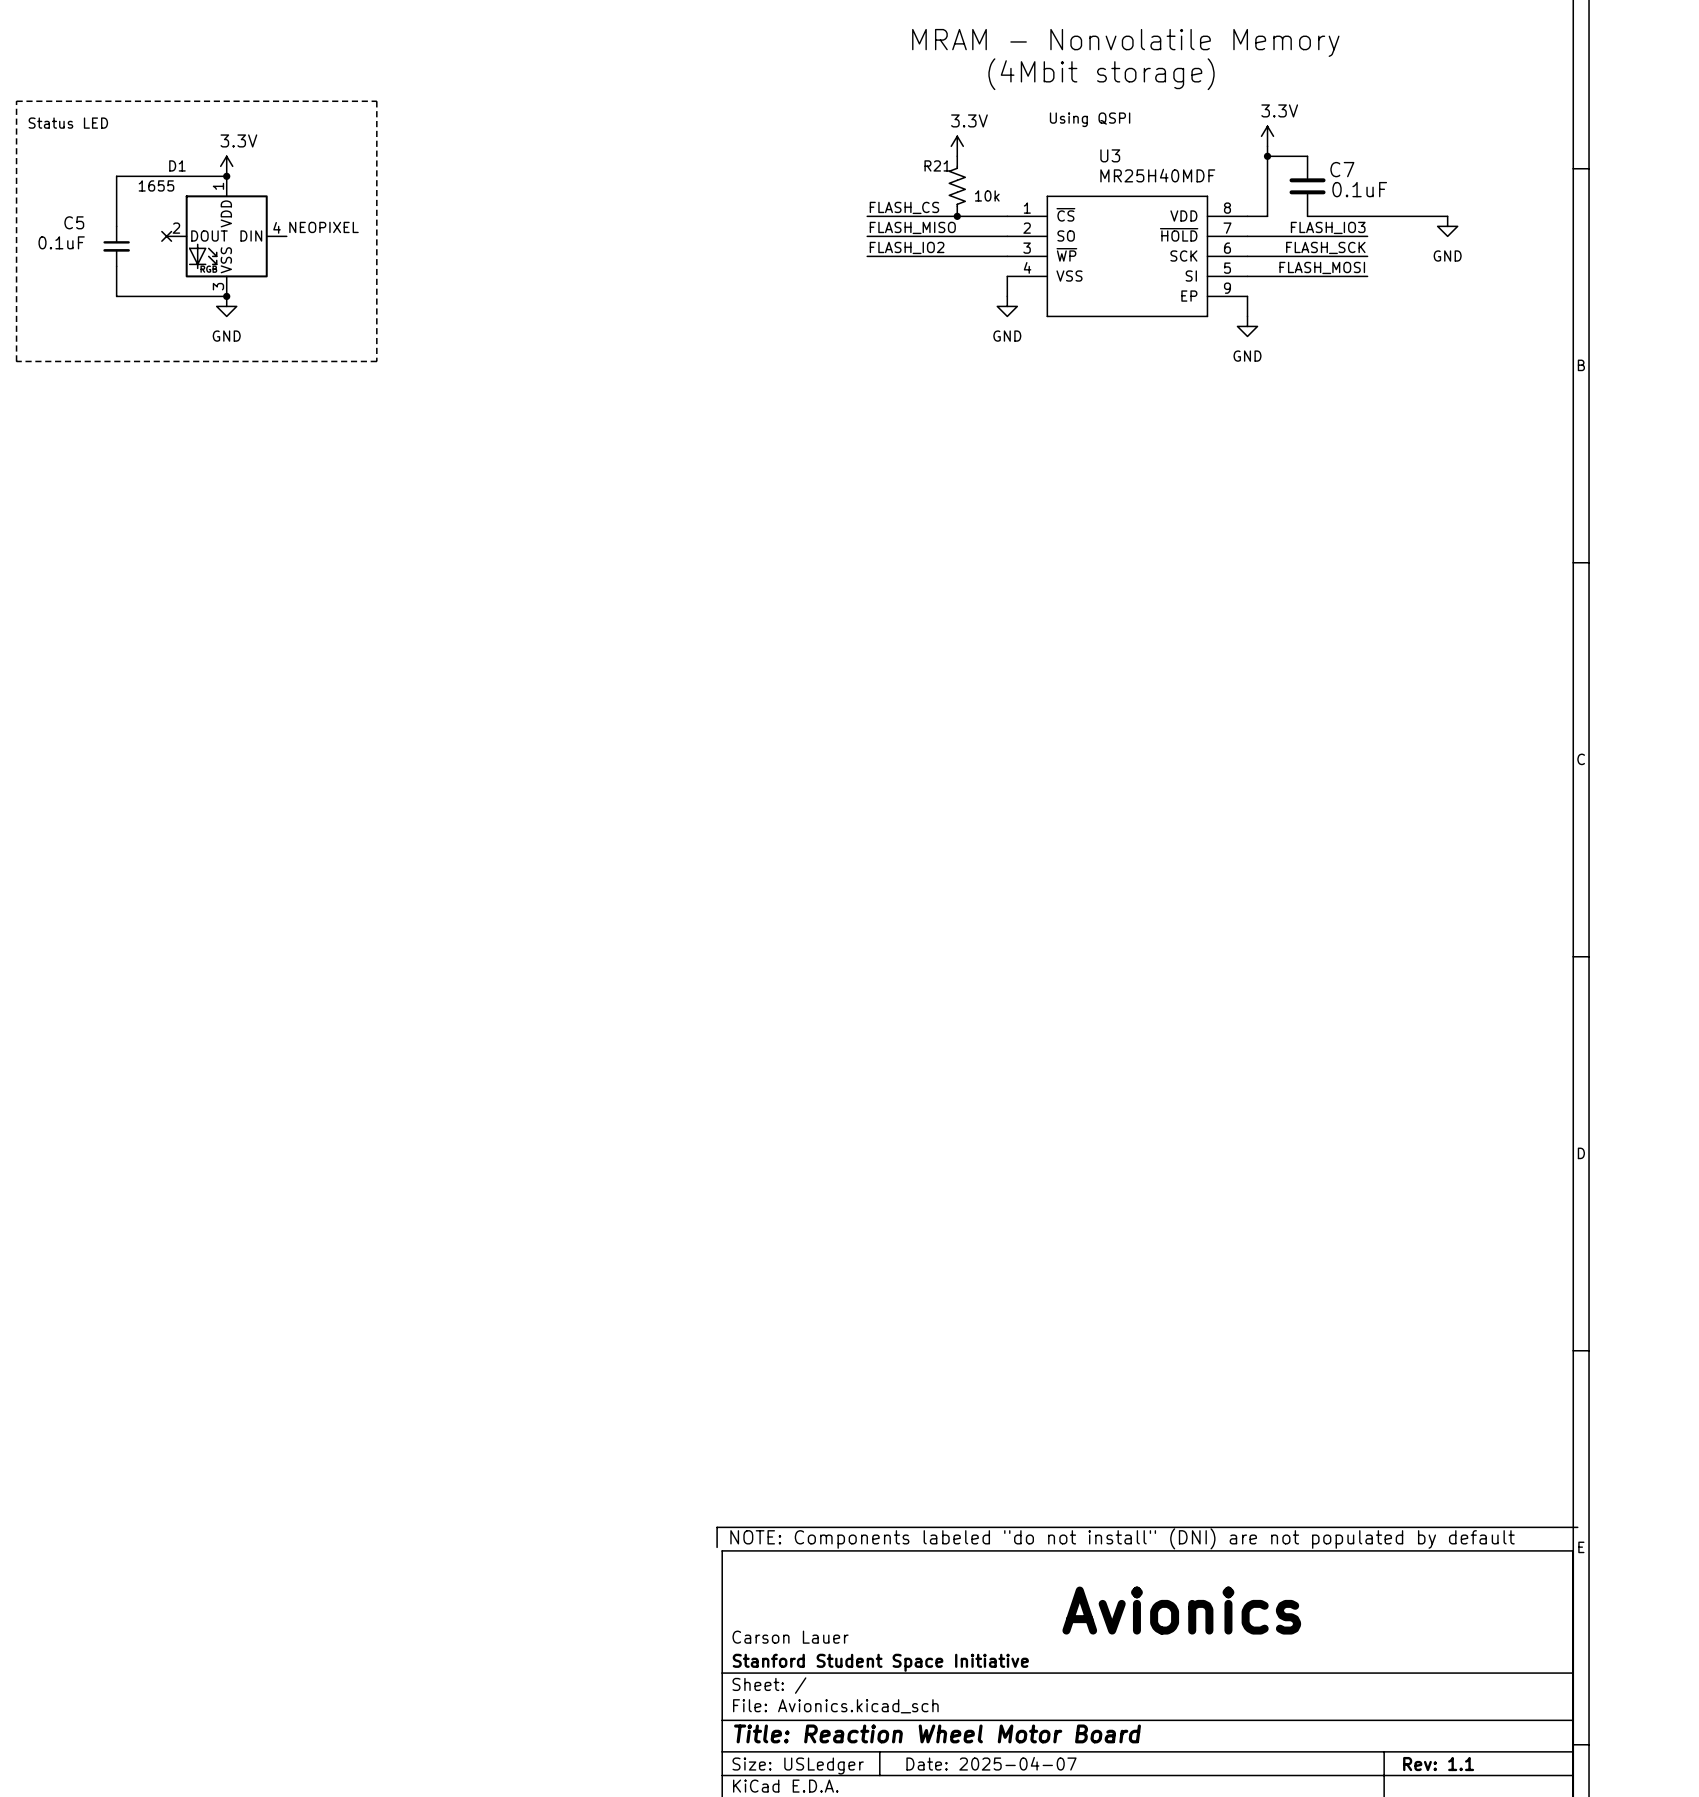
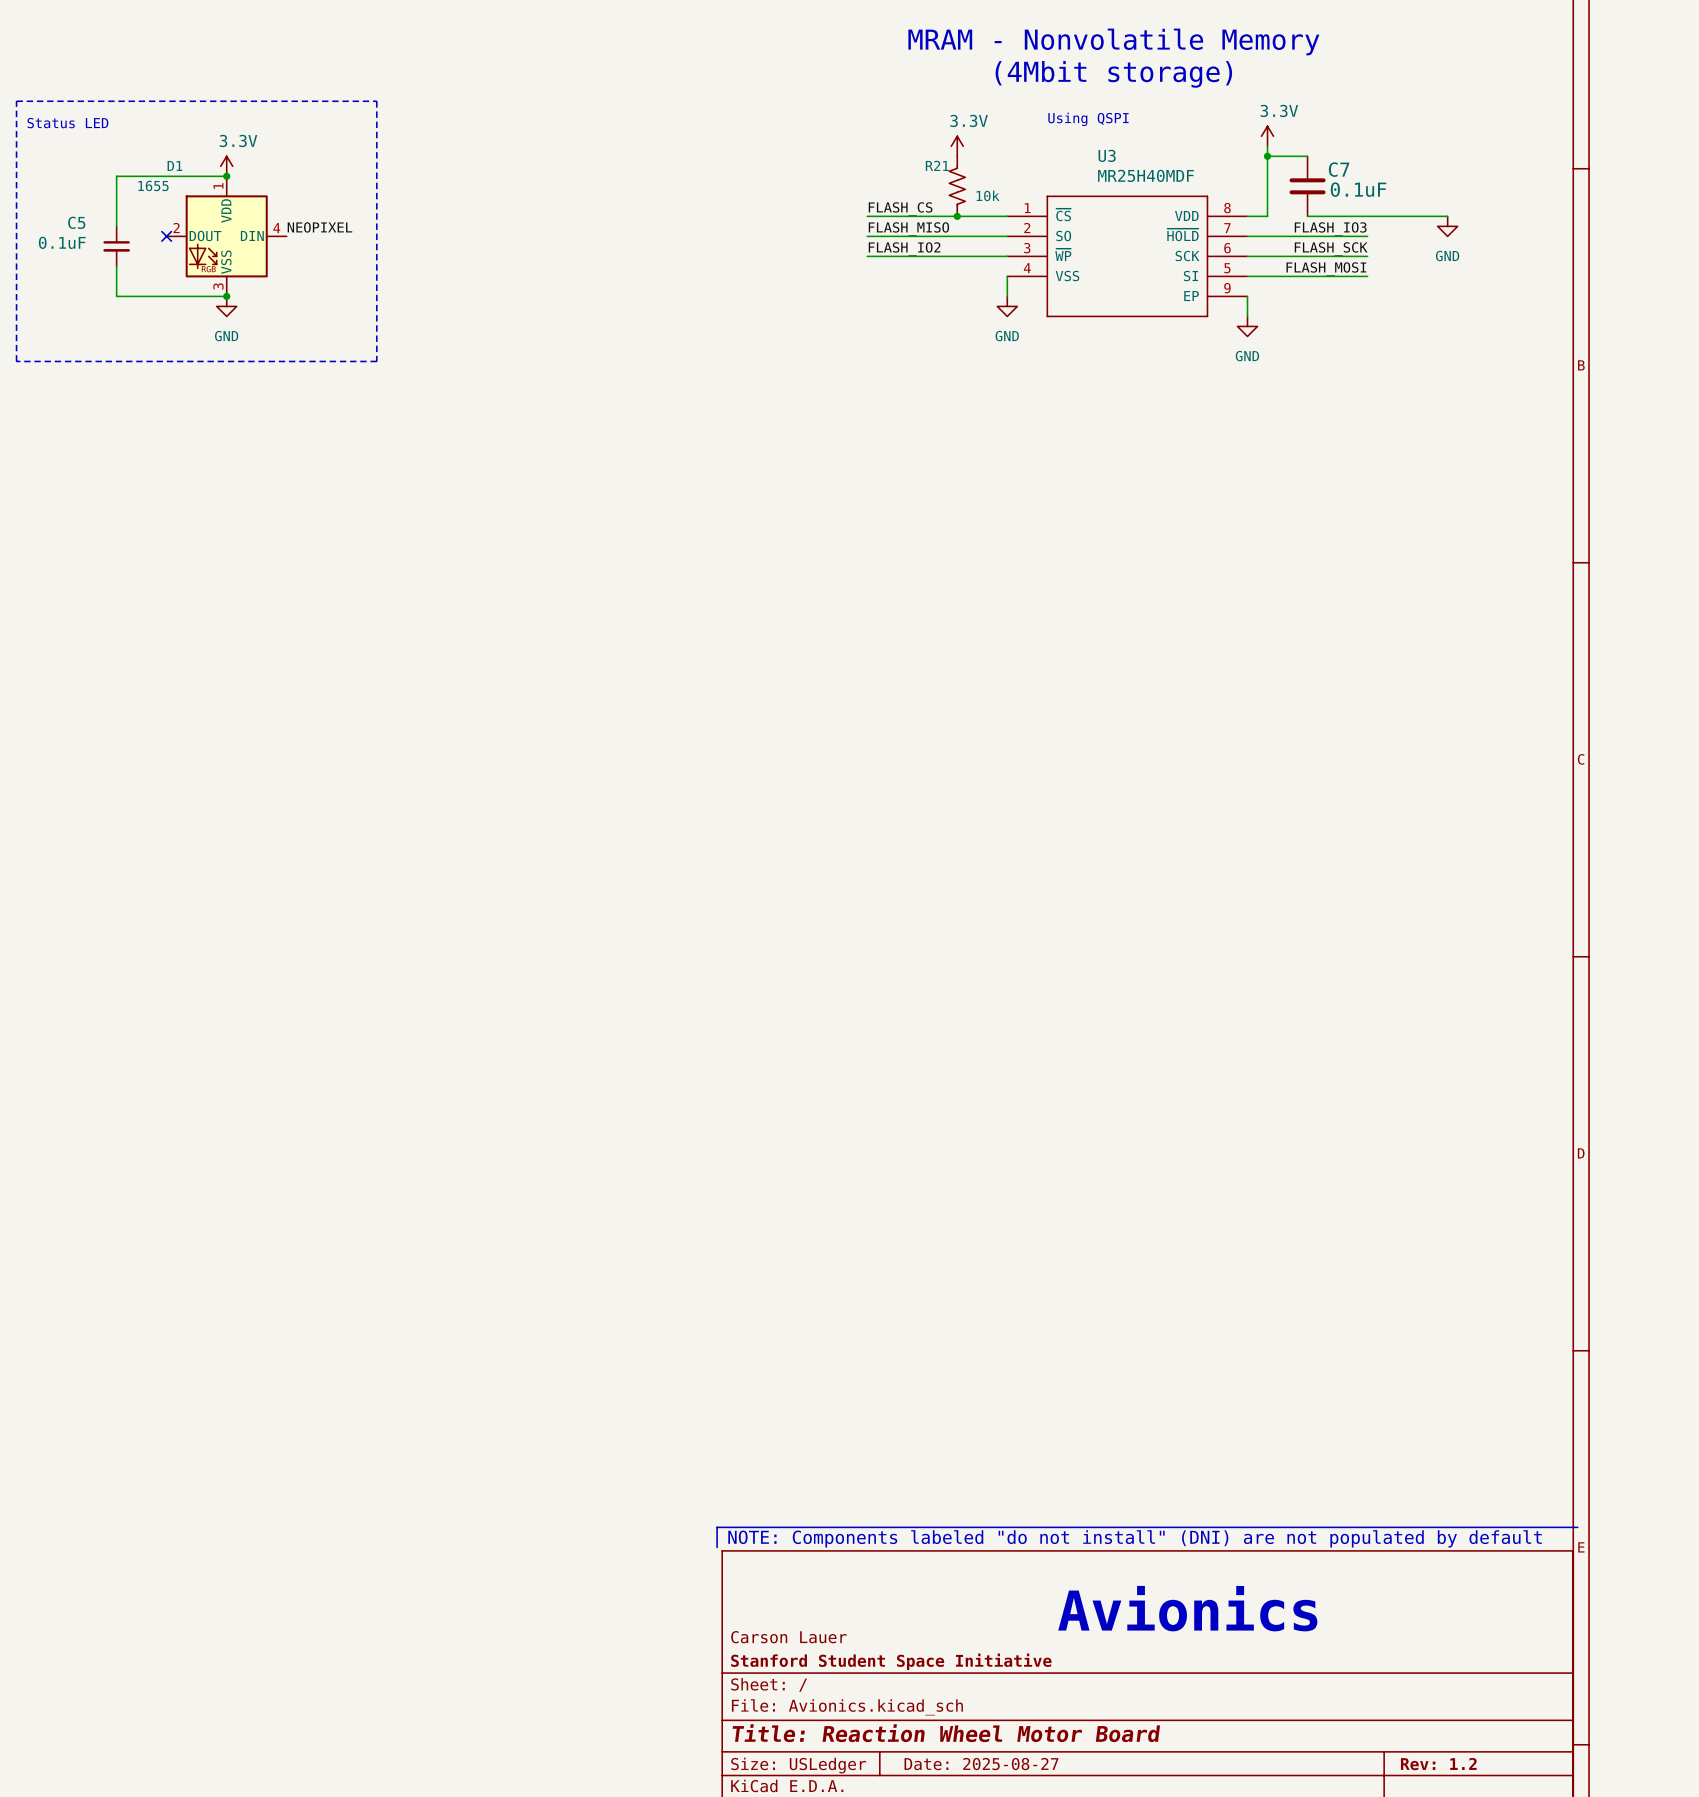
title block: Date: 2025-04-07 (991, 1763) -> Date: 2025-08-27 (981, 1764)
title block: Rev: 1.1 (1438, 1764) -> Rev: 1.2 (1438, 1764)

